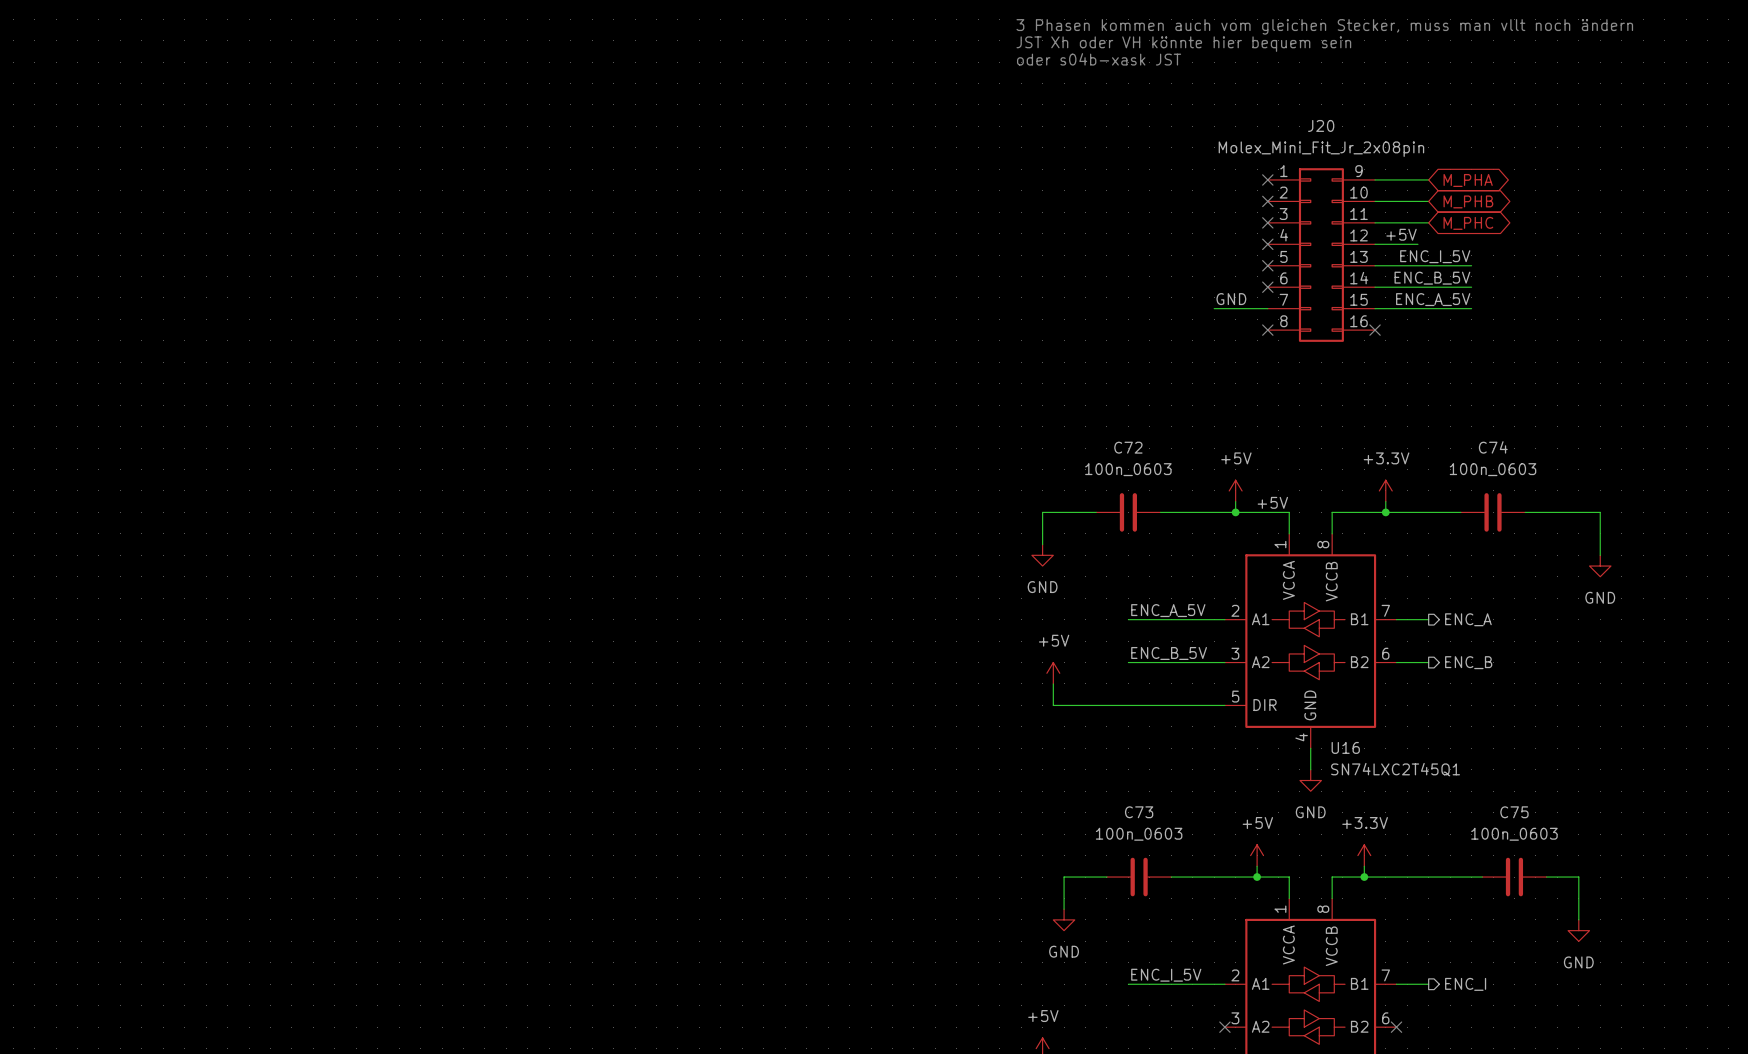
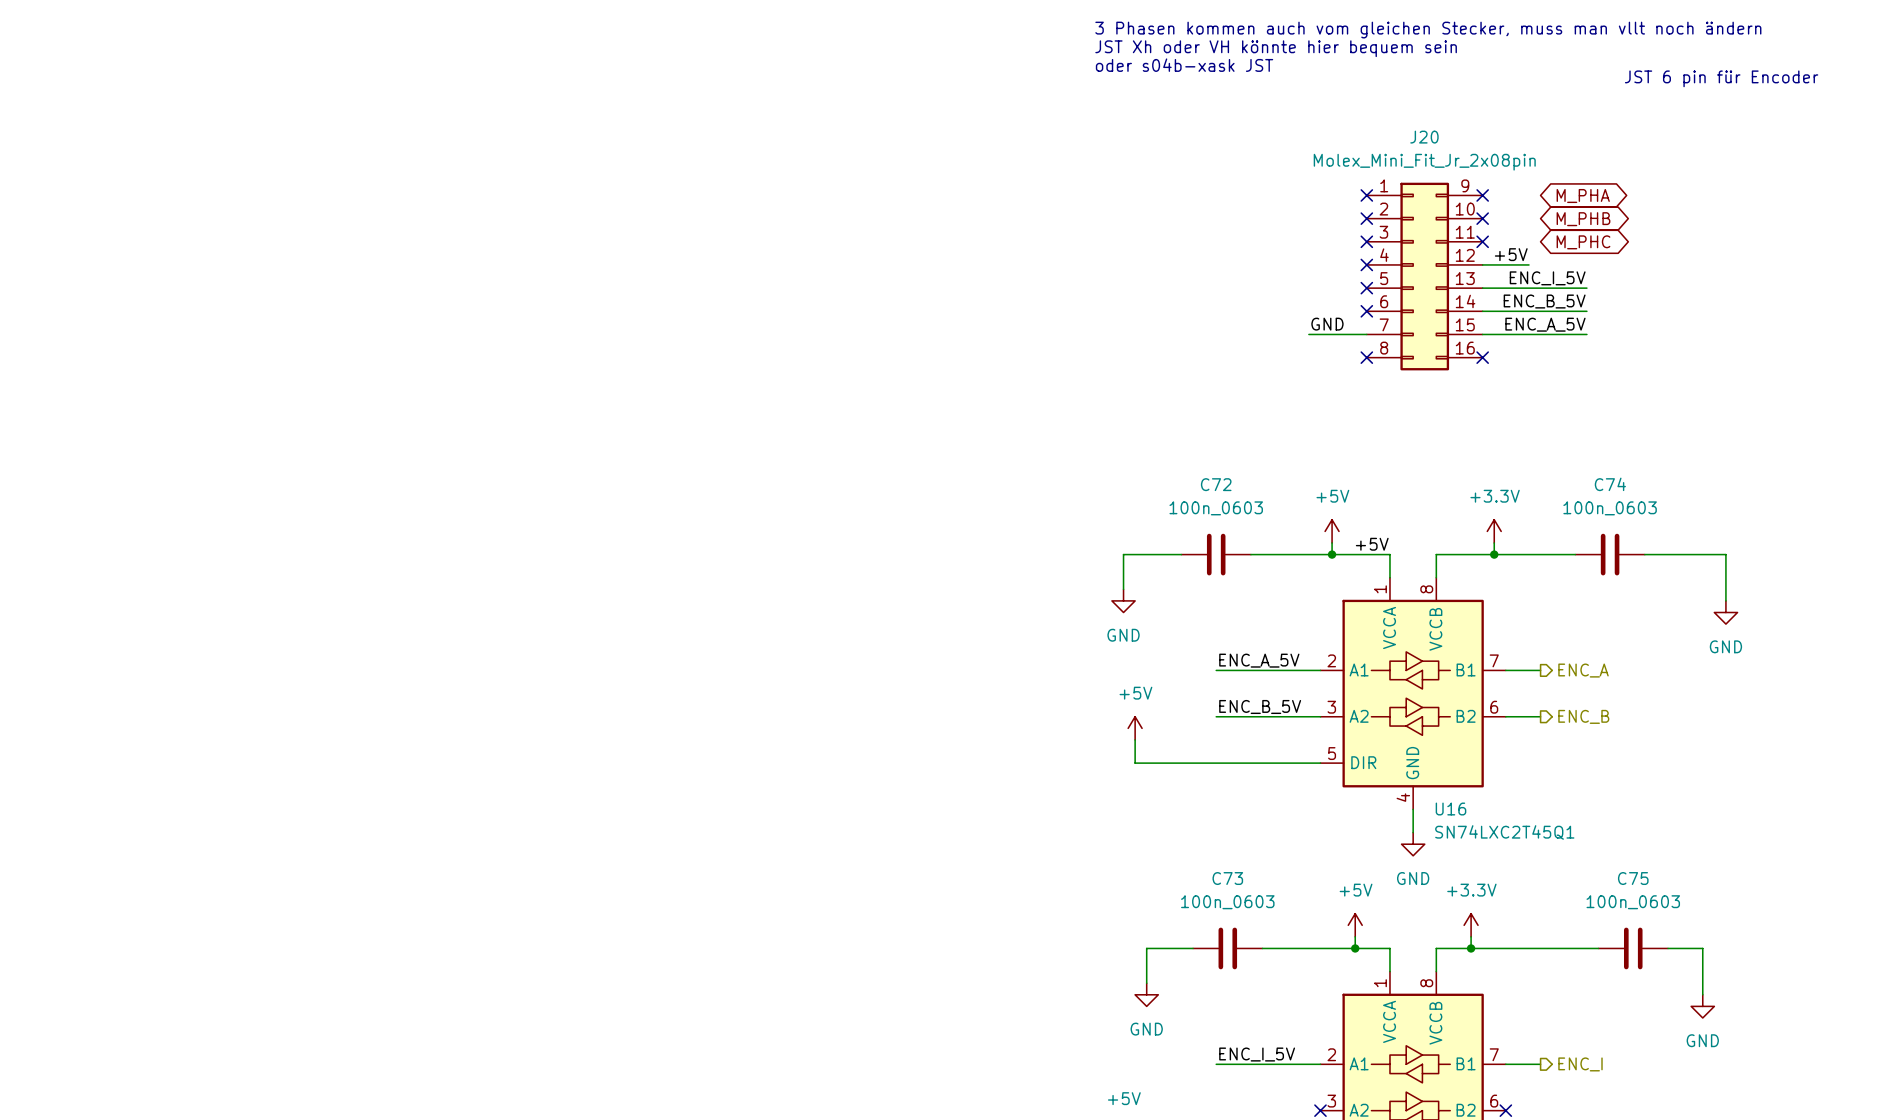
text: none -> JST 6 pin für Encoder (1721, 78)
wire: (1375, 179) (1428, 179) -> none
no-connect mark: none -> (1482, 195)
wire: (1375, 201) (1428, 201) -> none
no-connect mark: none -> (1482, 218)
wire: (1375, 222) (1428, 222) -> none
no-connect mark: none -> (1482, 241)

